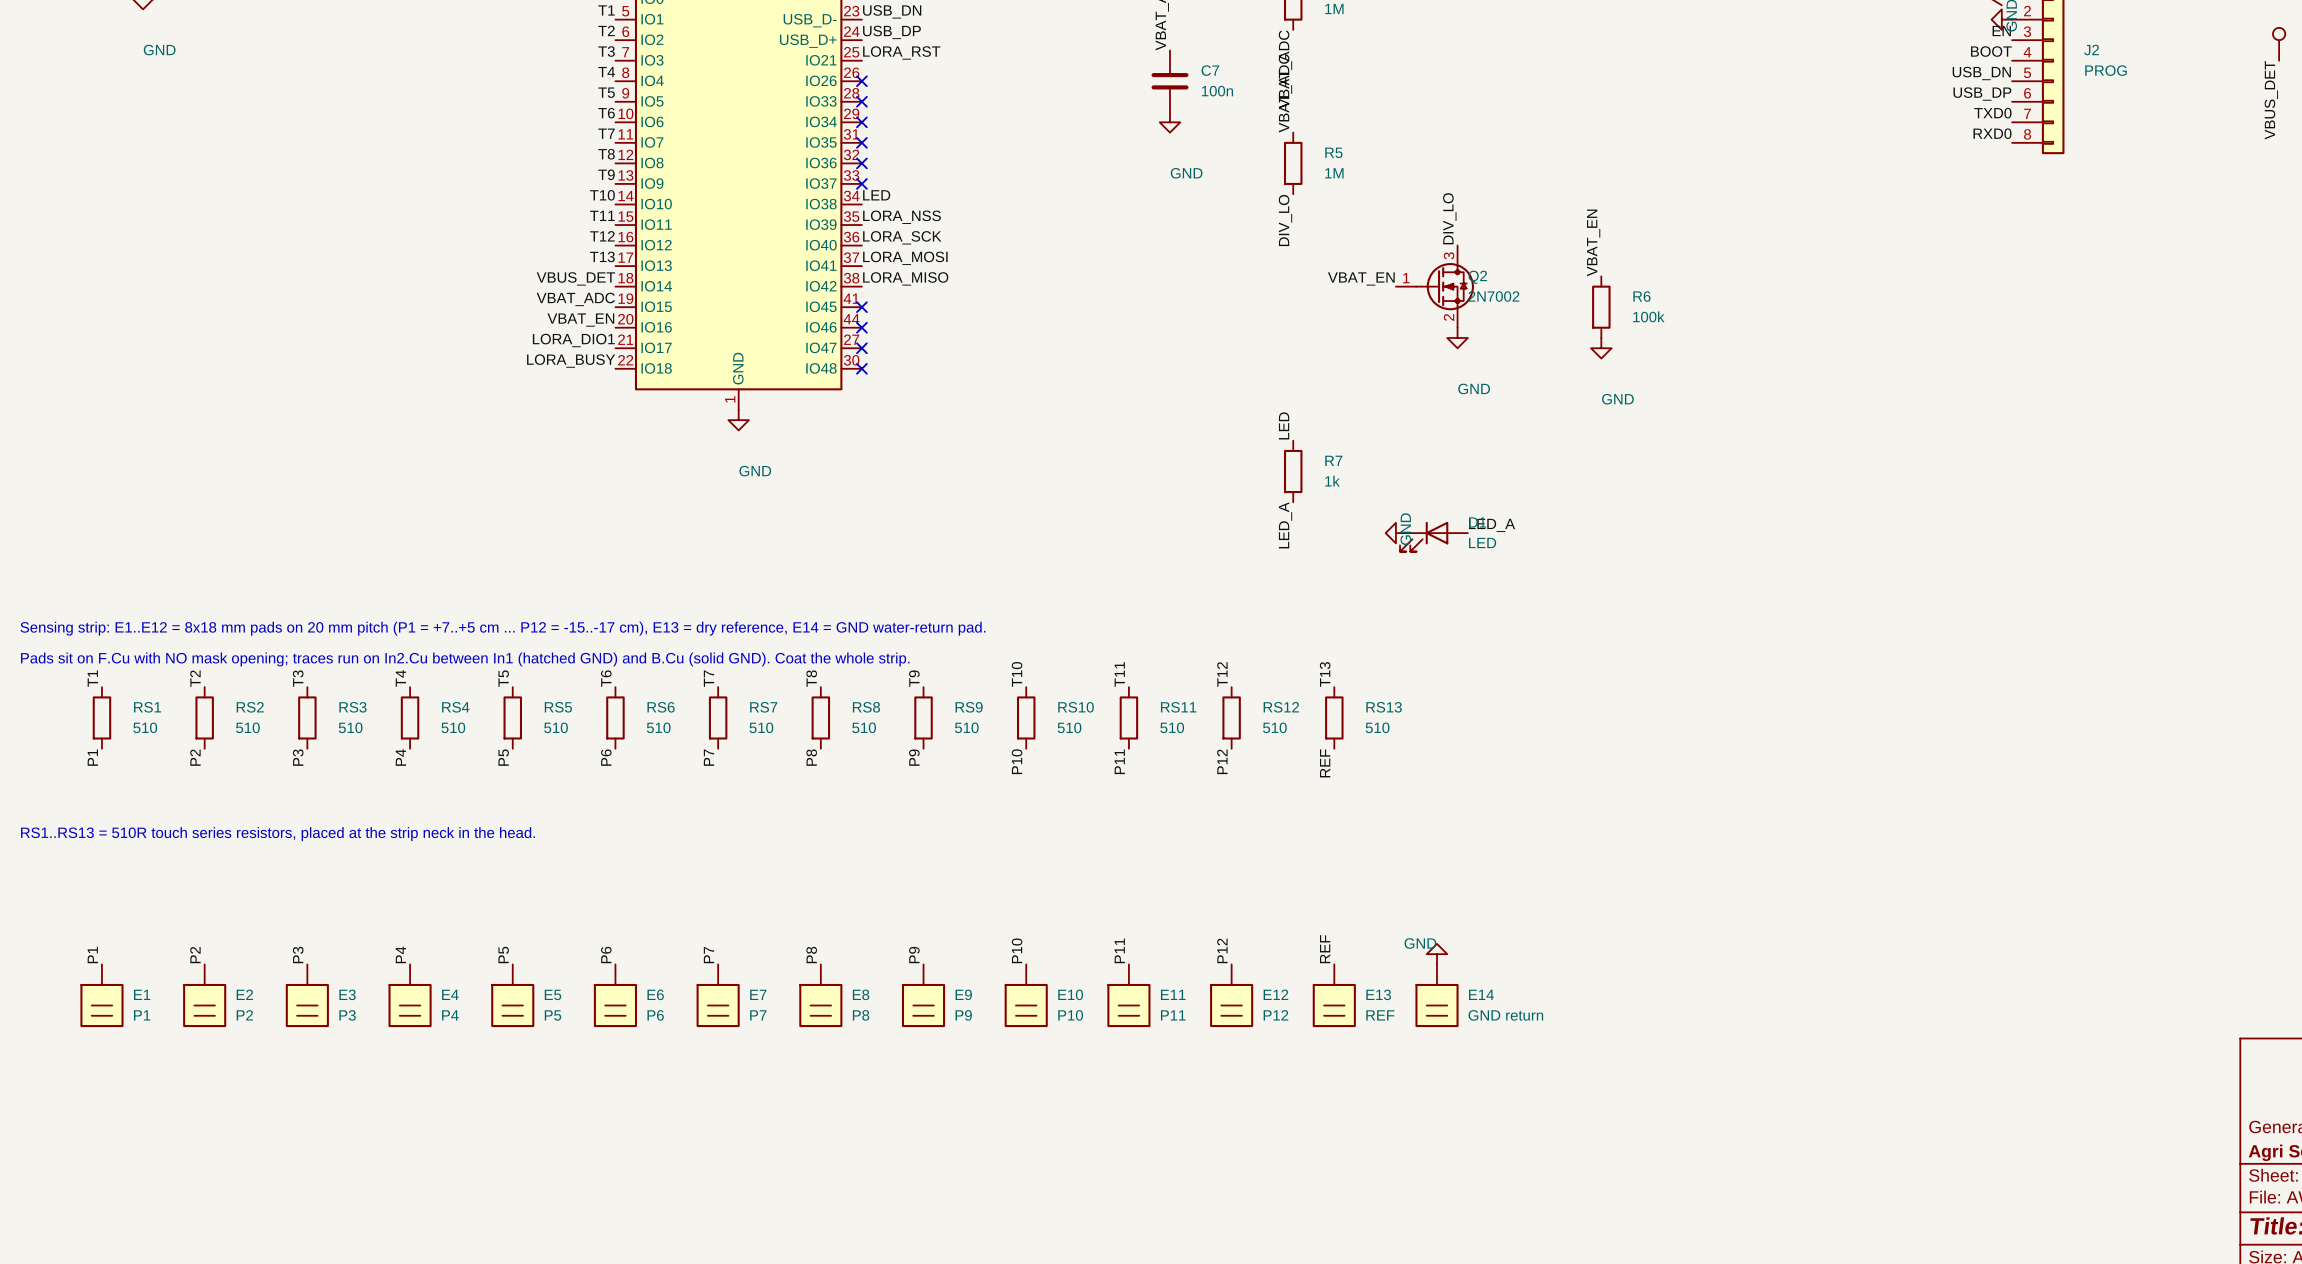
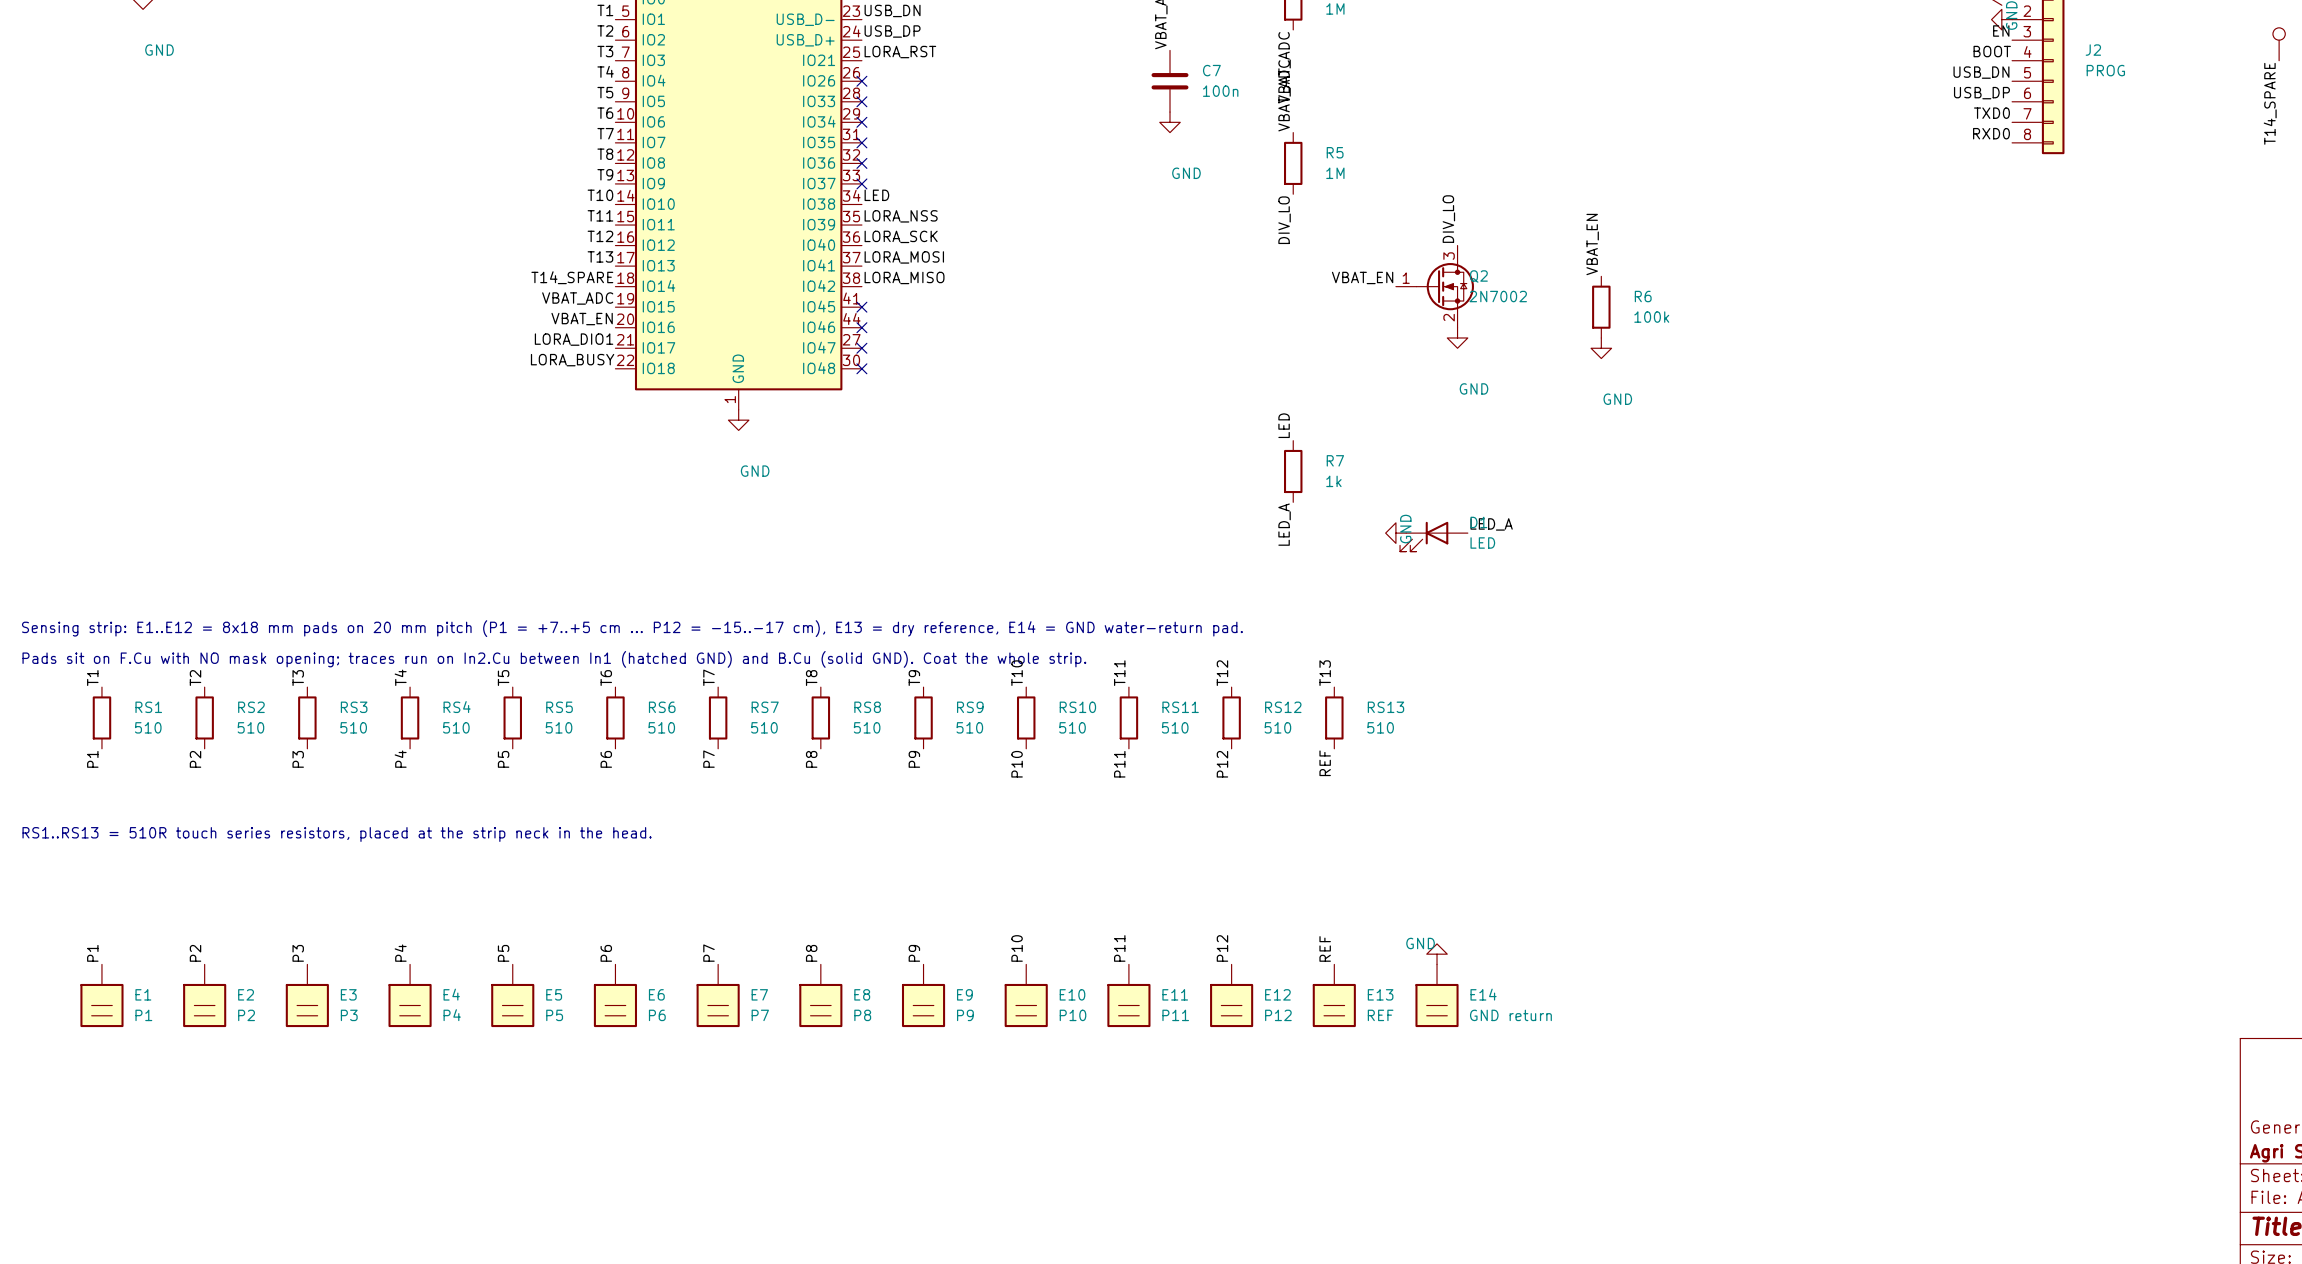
label: VBUS_DET (2271, 100) -> T14_SPARE (2270, 103)
label: VBUS_DET (575, 278) -> T14_SPARE (572, 277)

